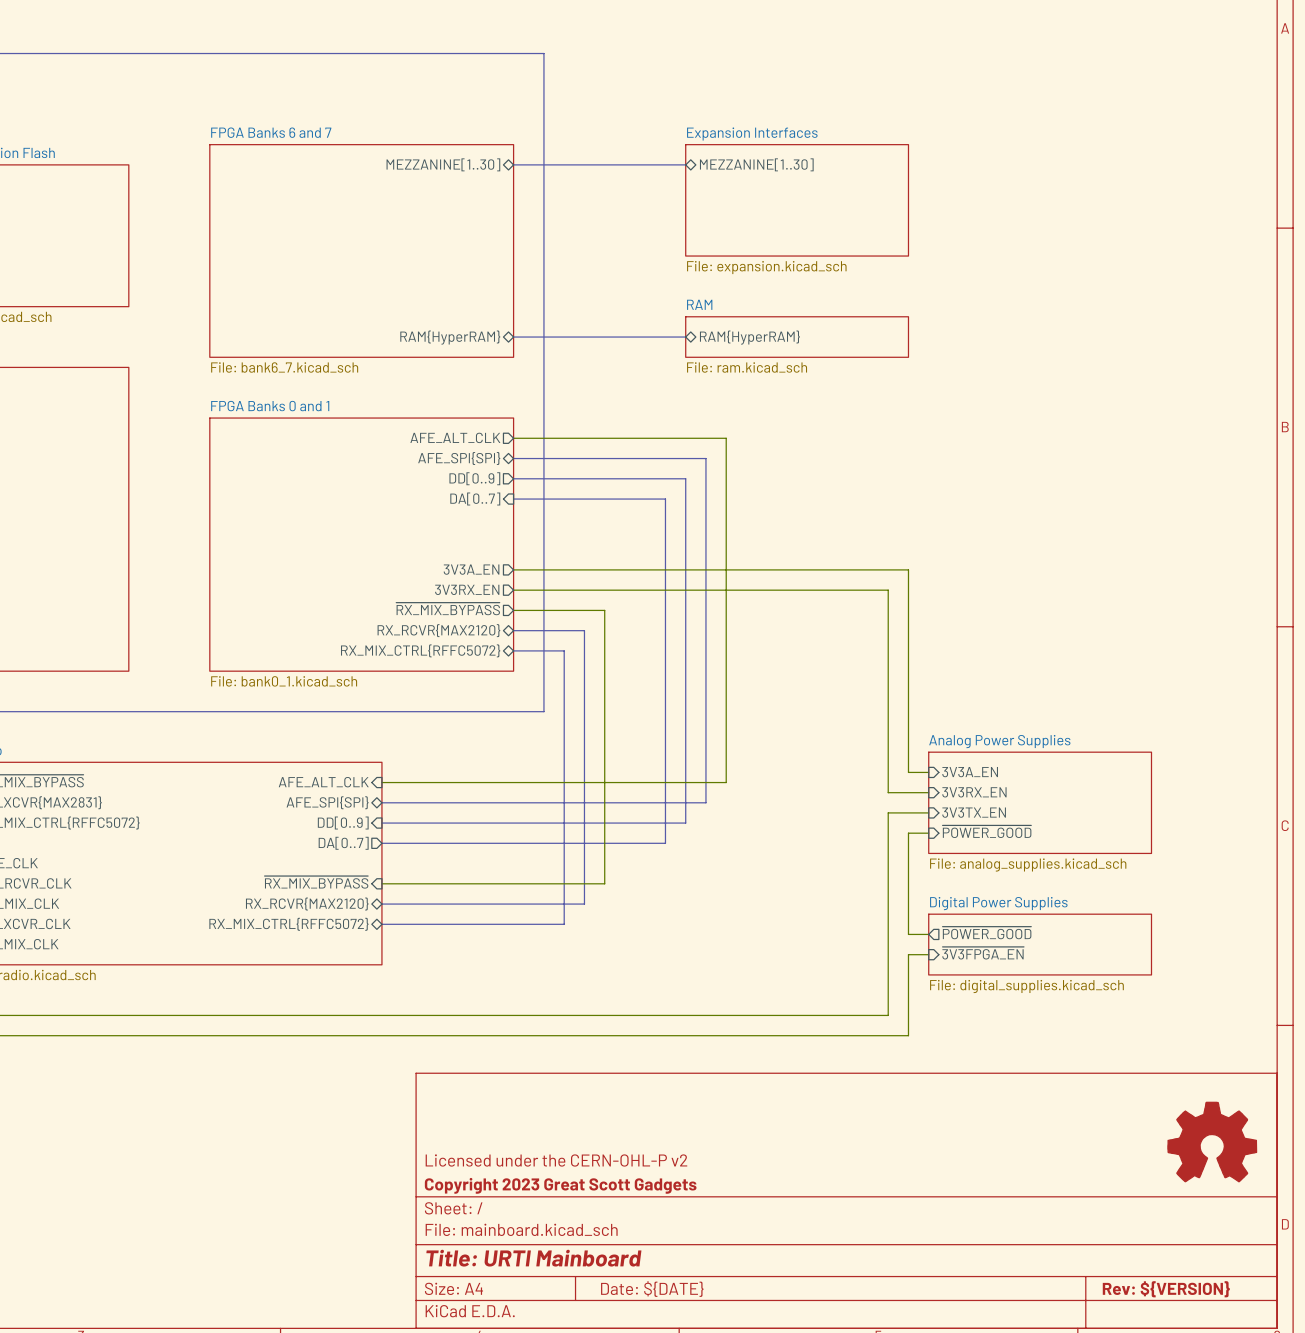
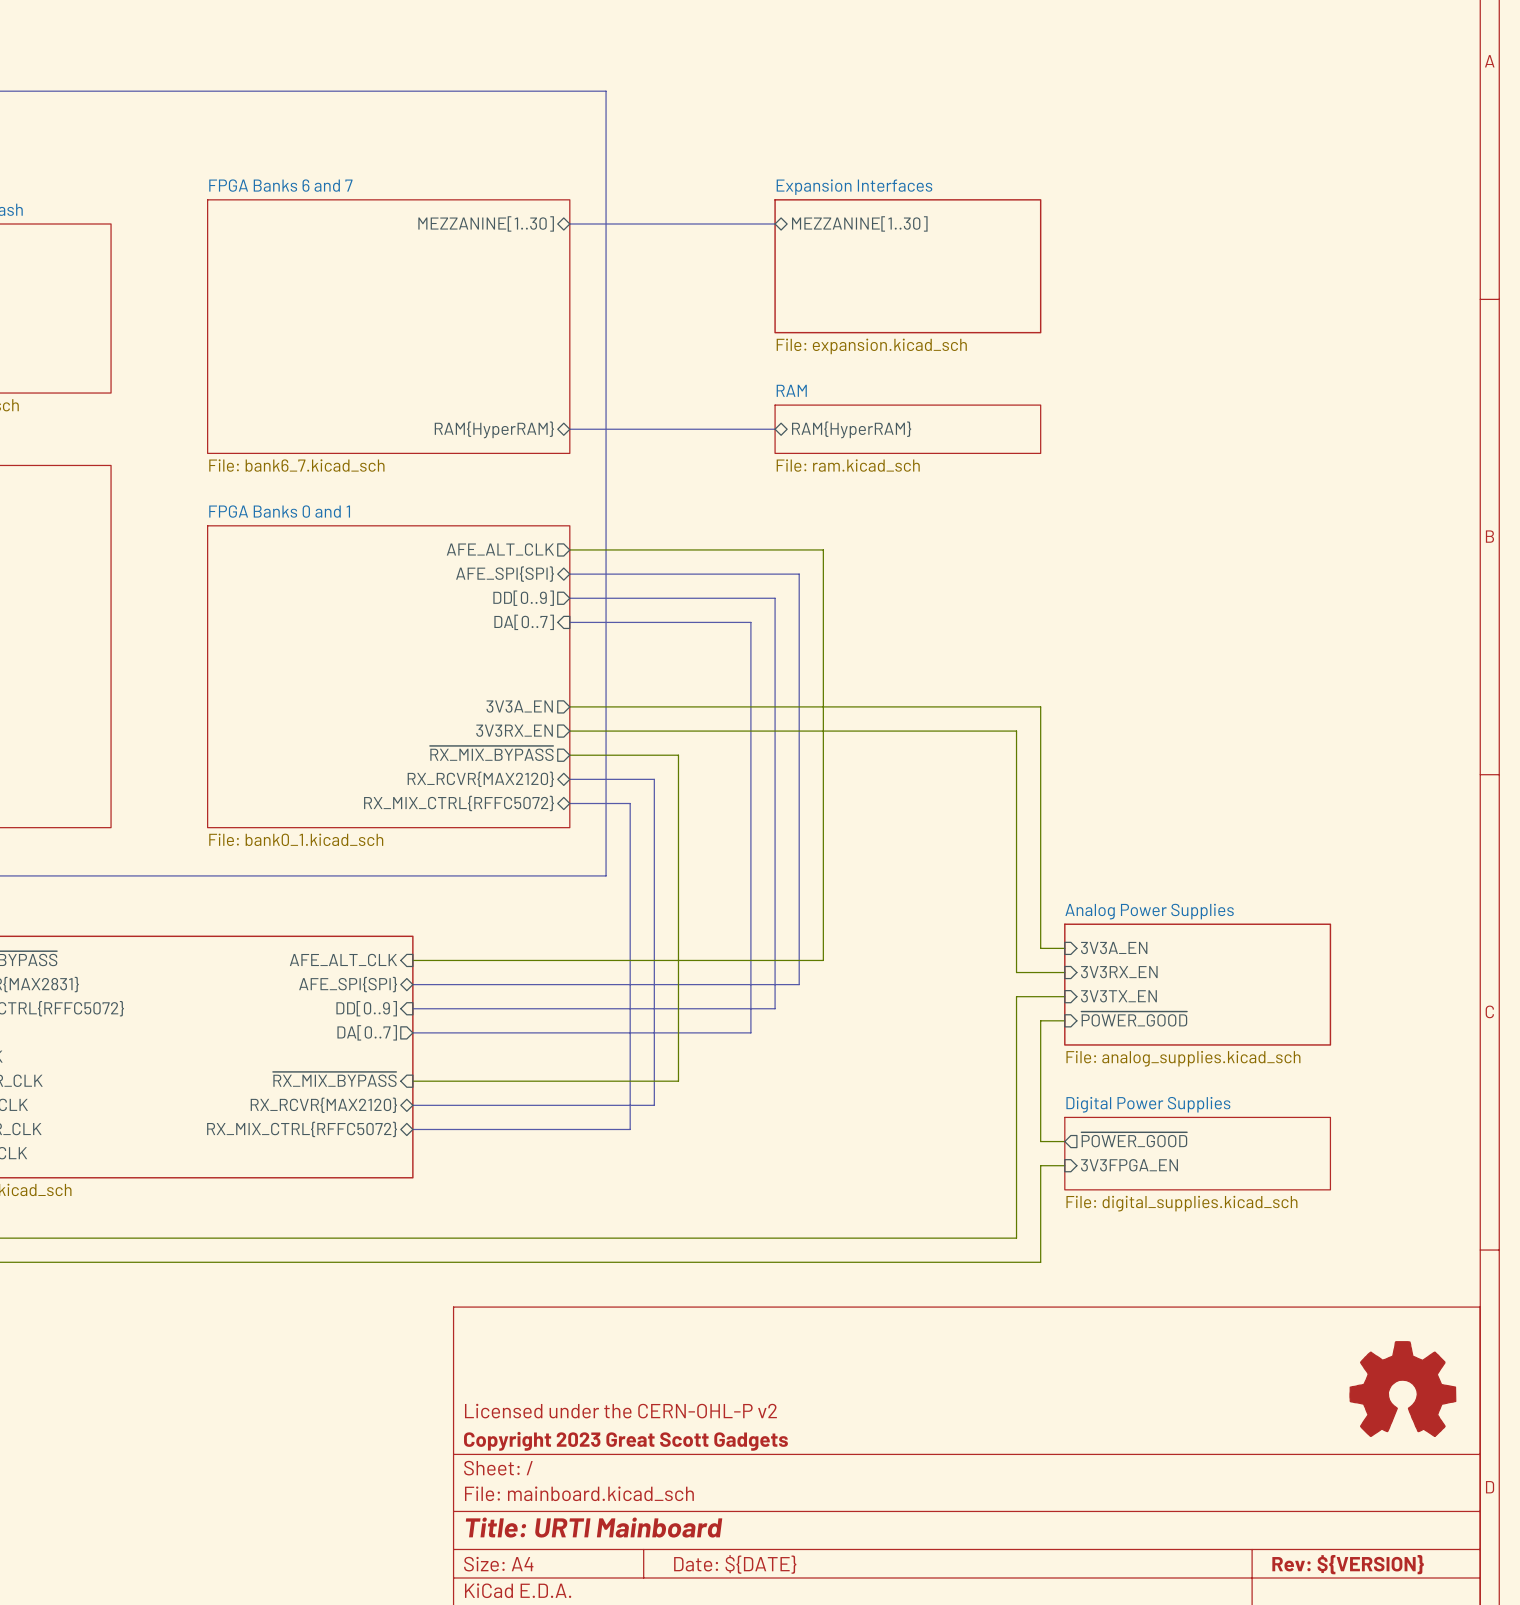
sheet pin: ~{3V3FPGA_EN} (983, 953) -> 3V3FPGA_EN (1129, 1165)

